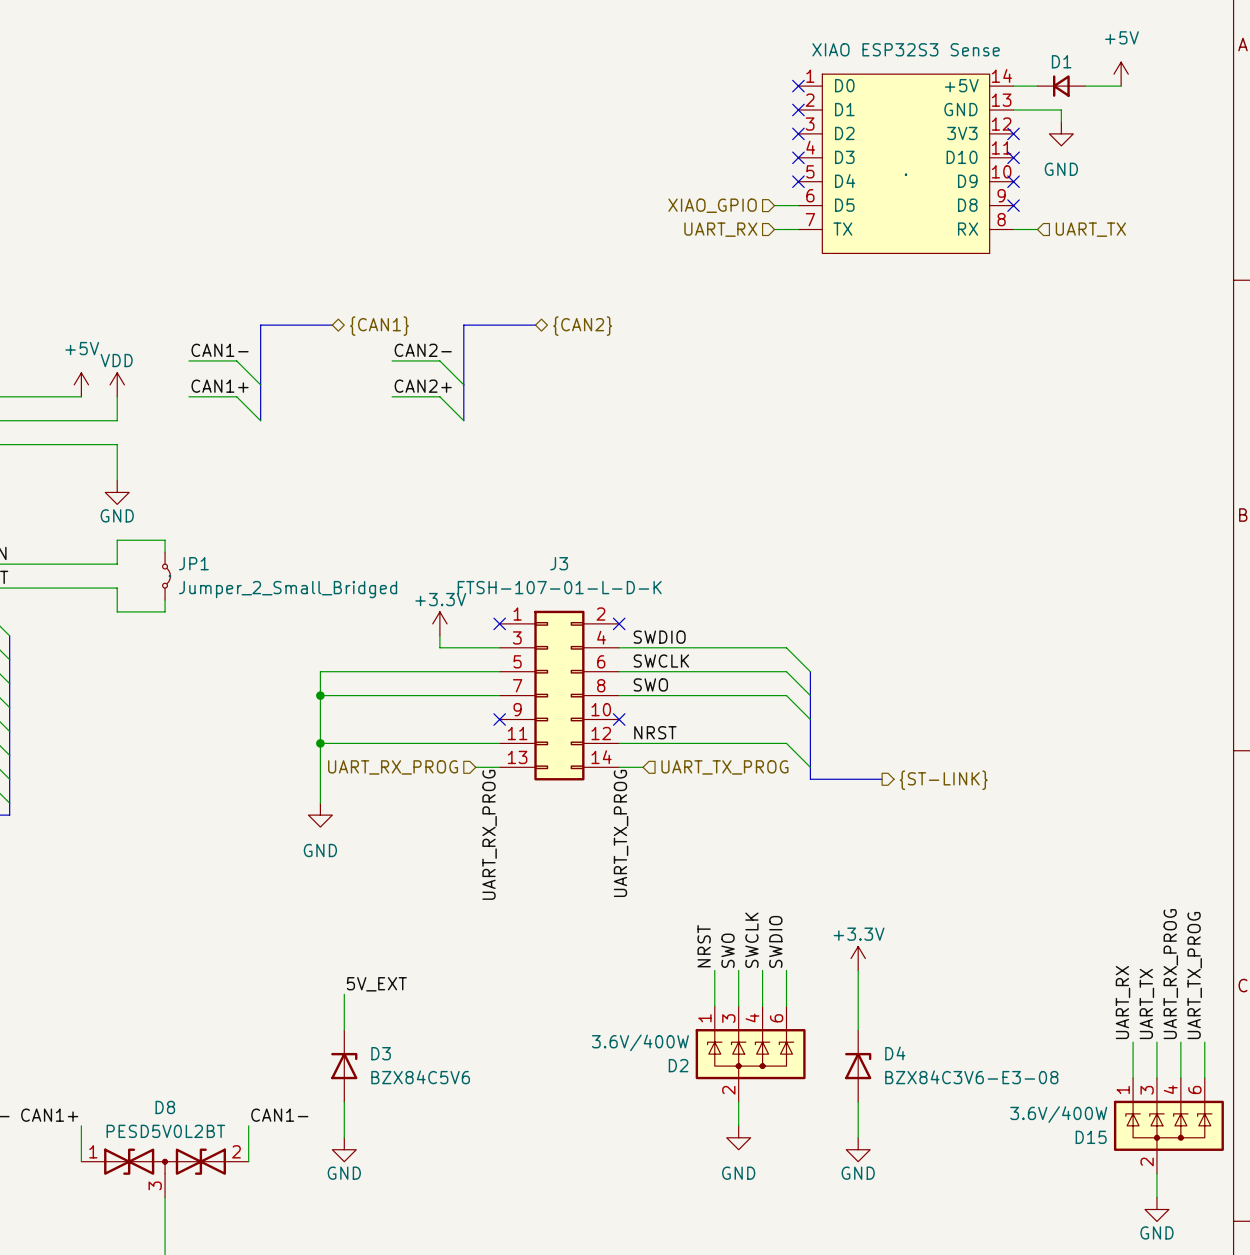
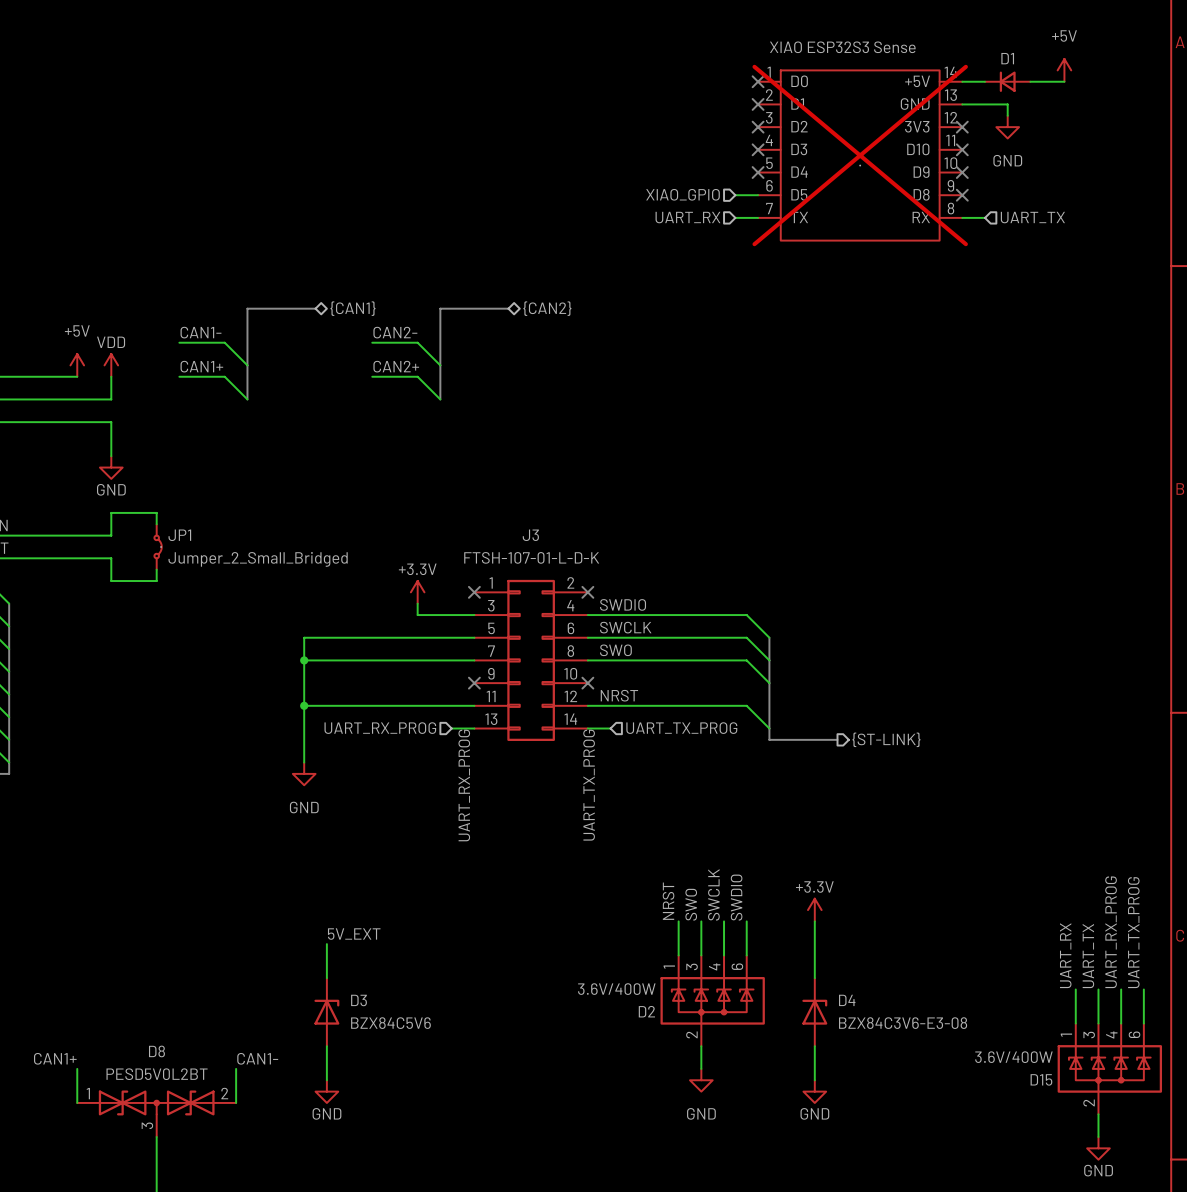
part do-not-place cross: none -> (860, 155)

